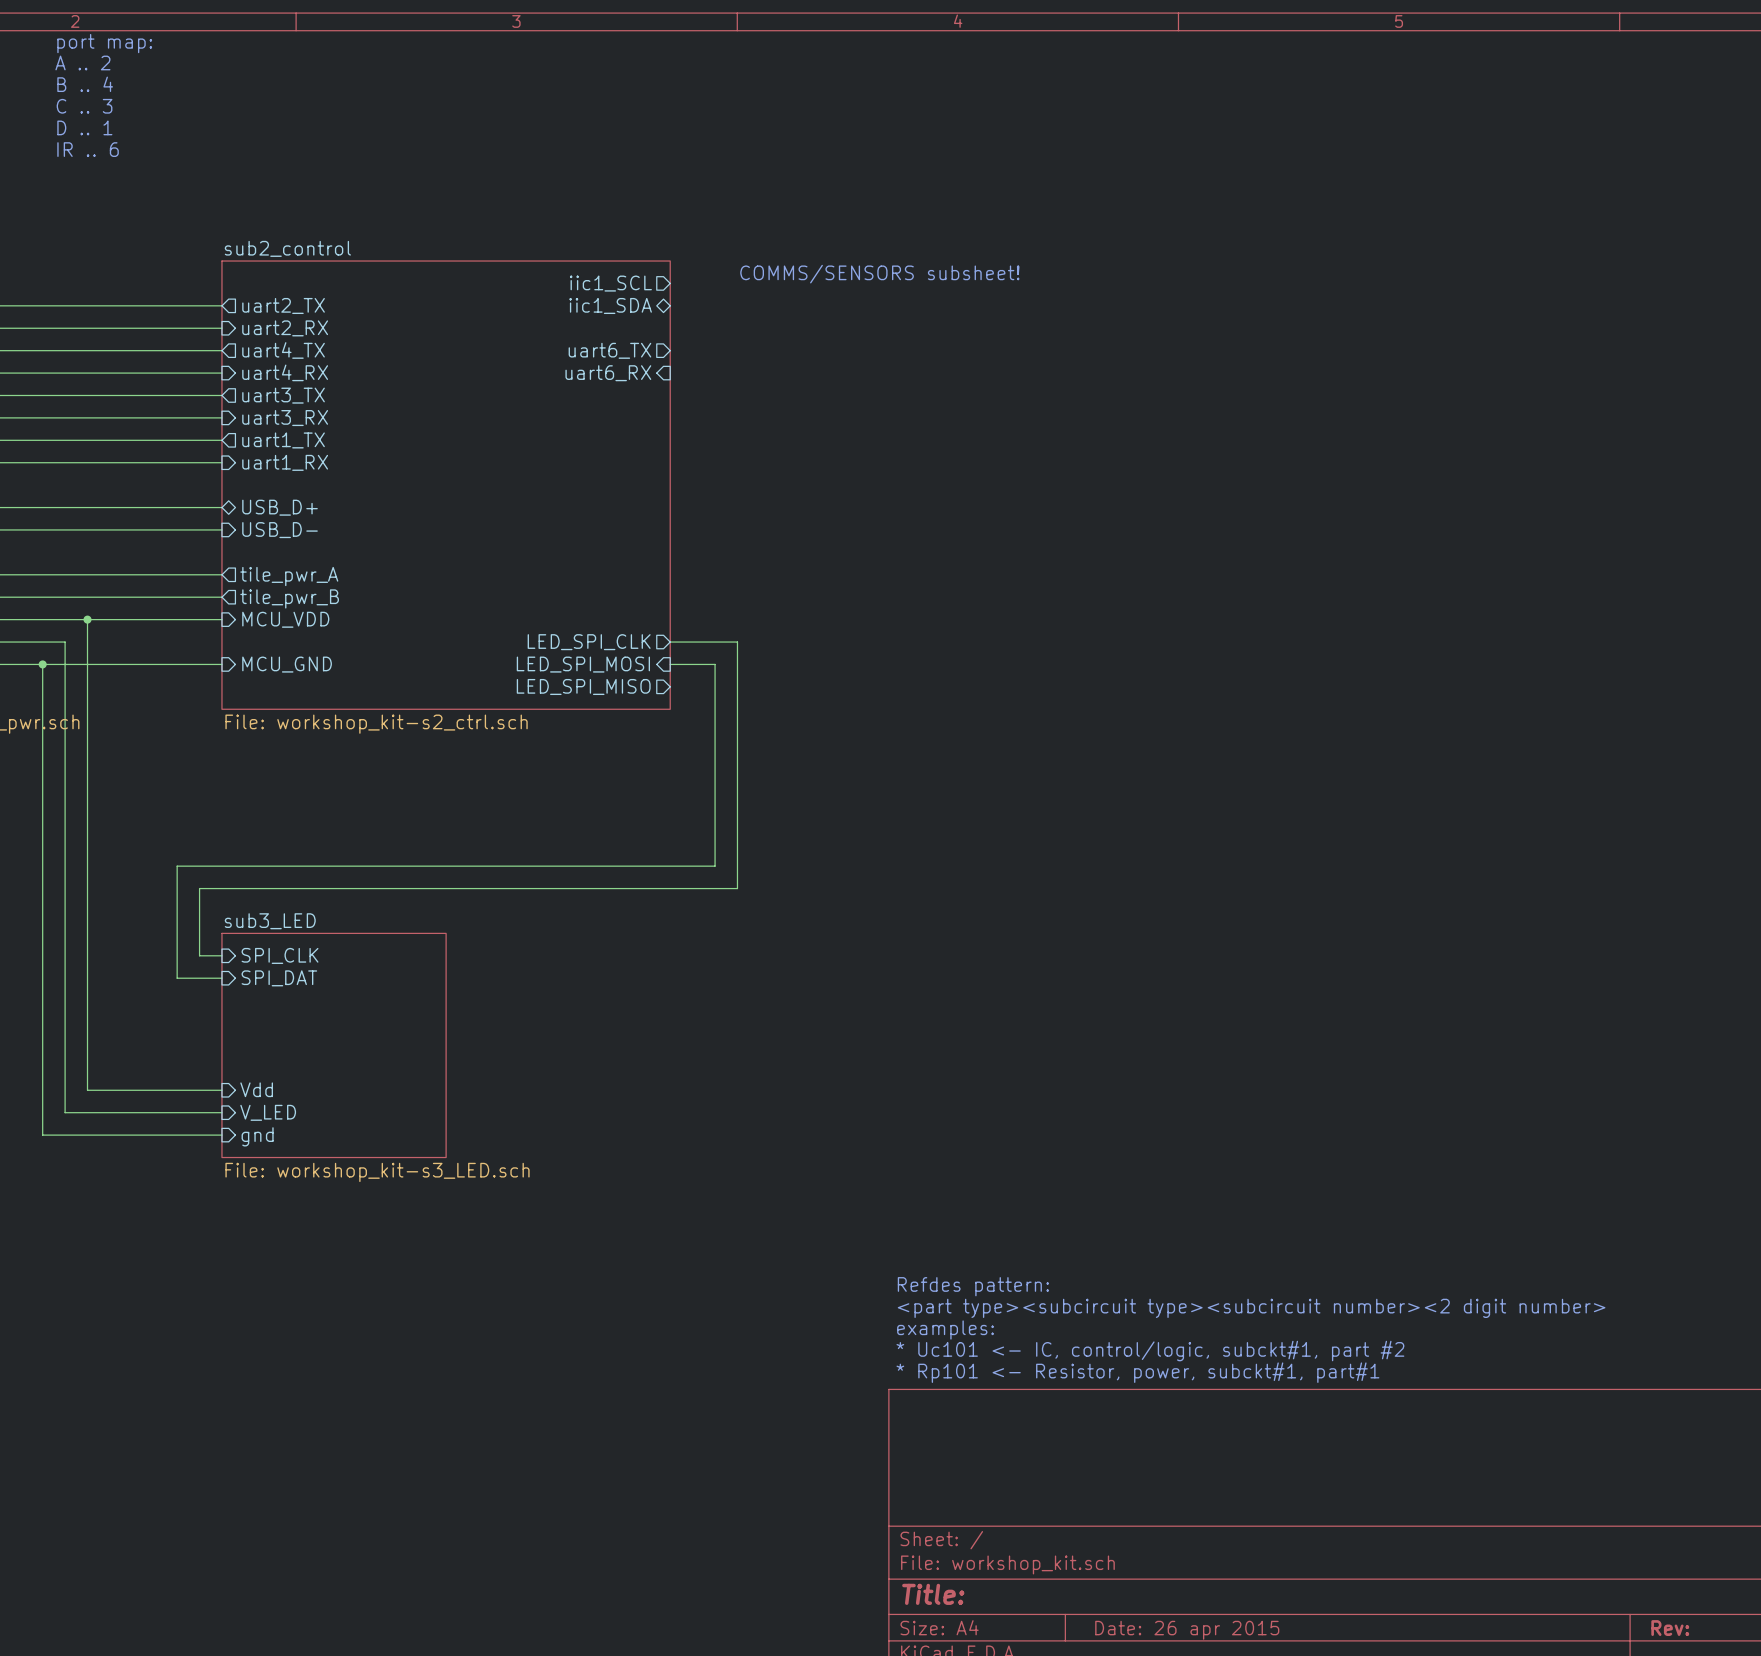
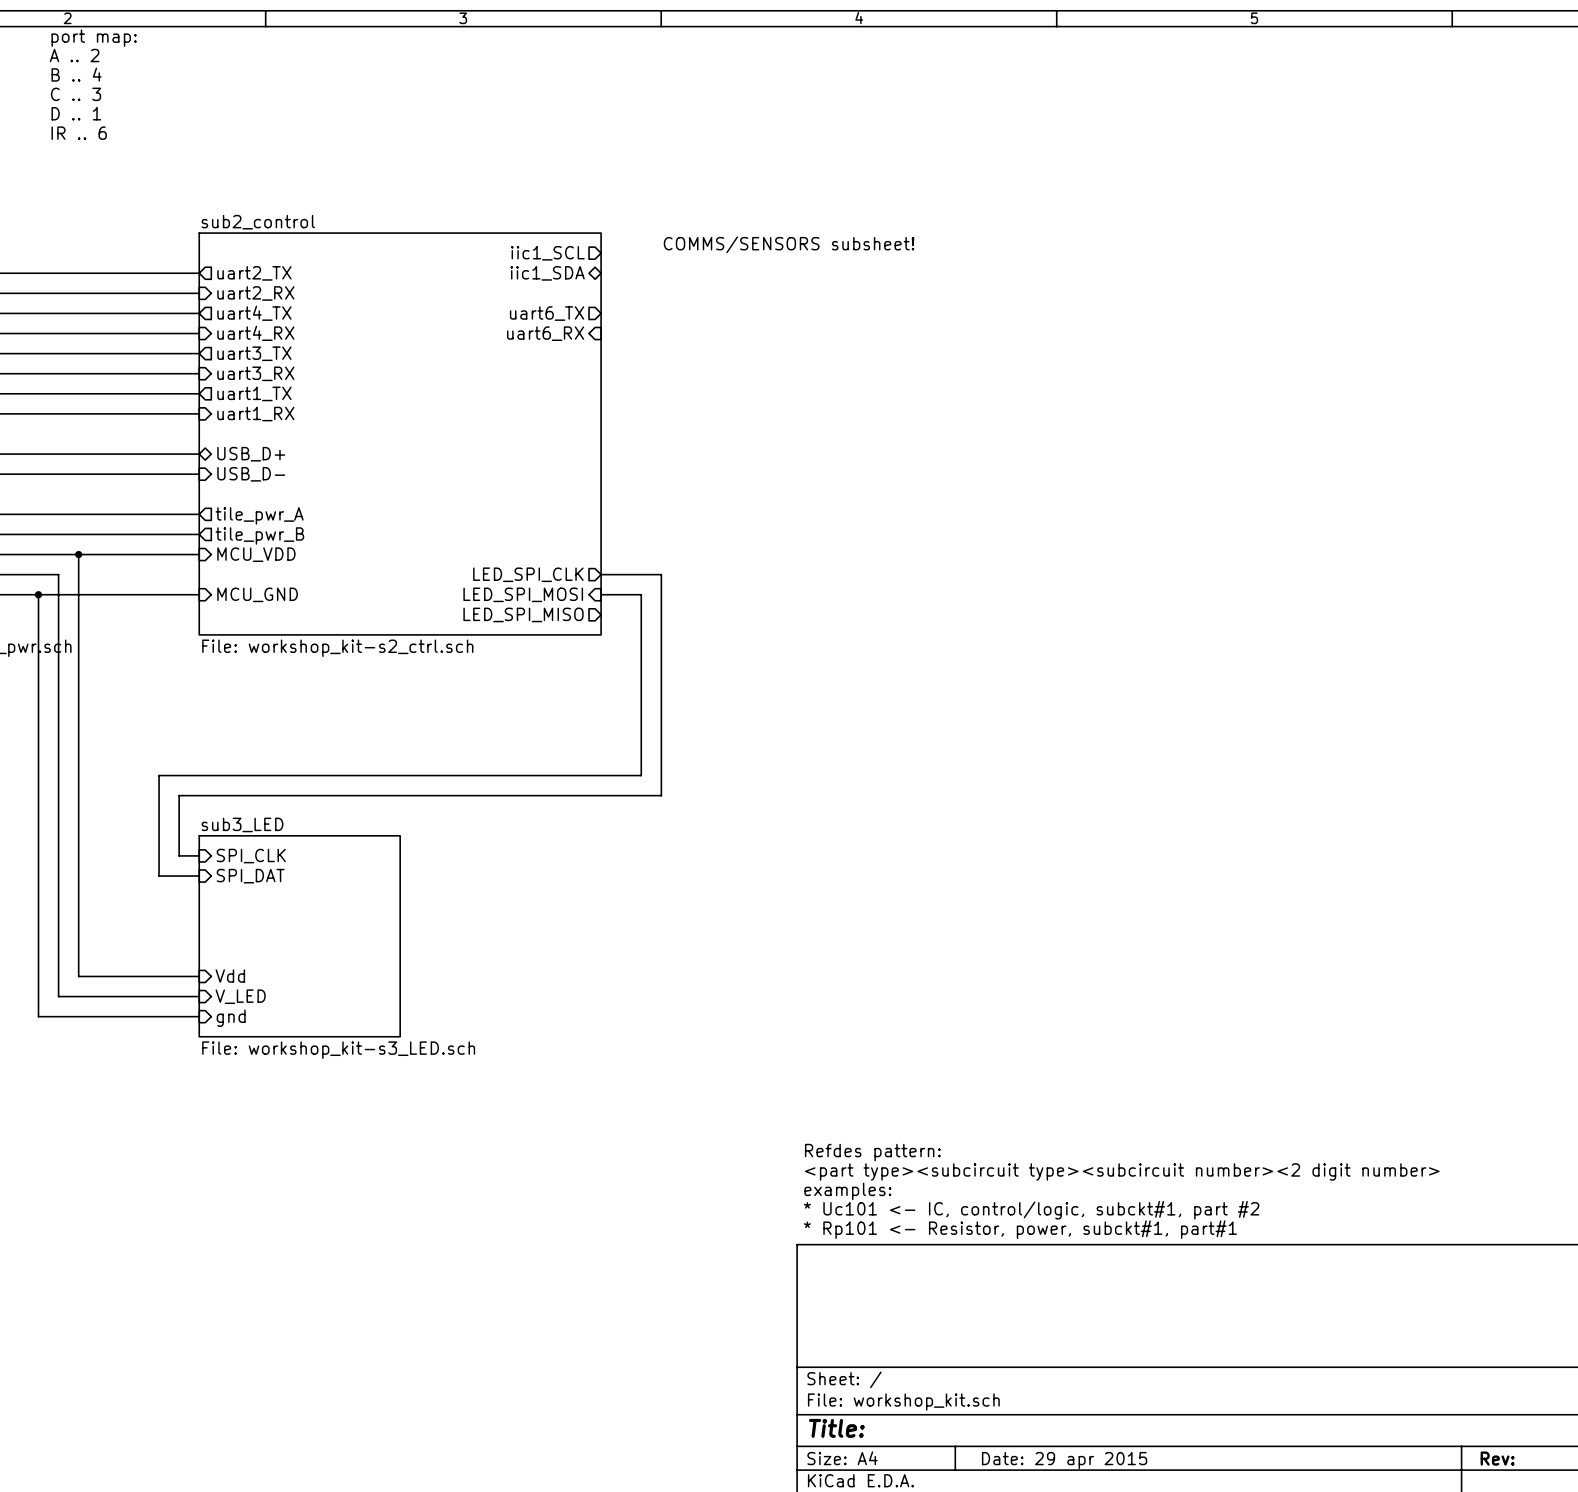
title block: Date: 26 apr 2015 (1187, 1630) -> Date: 29 apr 2015 (1064, 1460)

